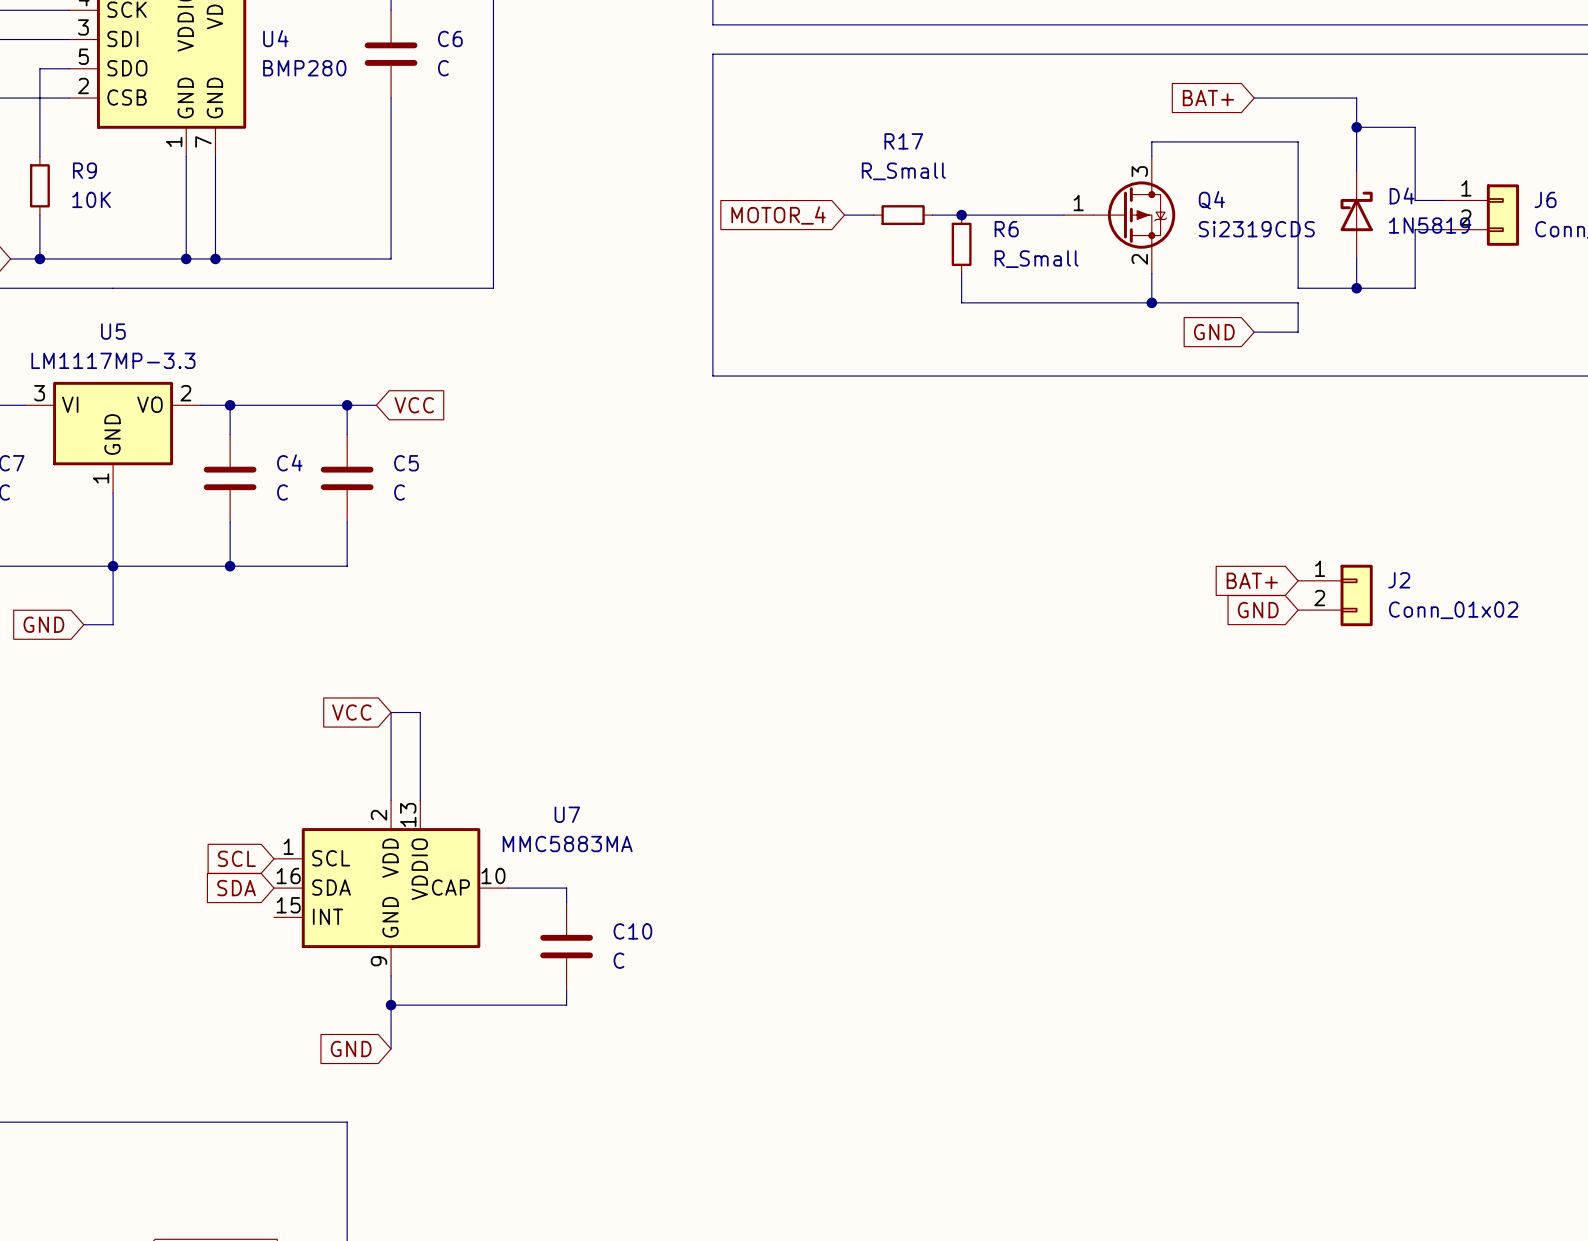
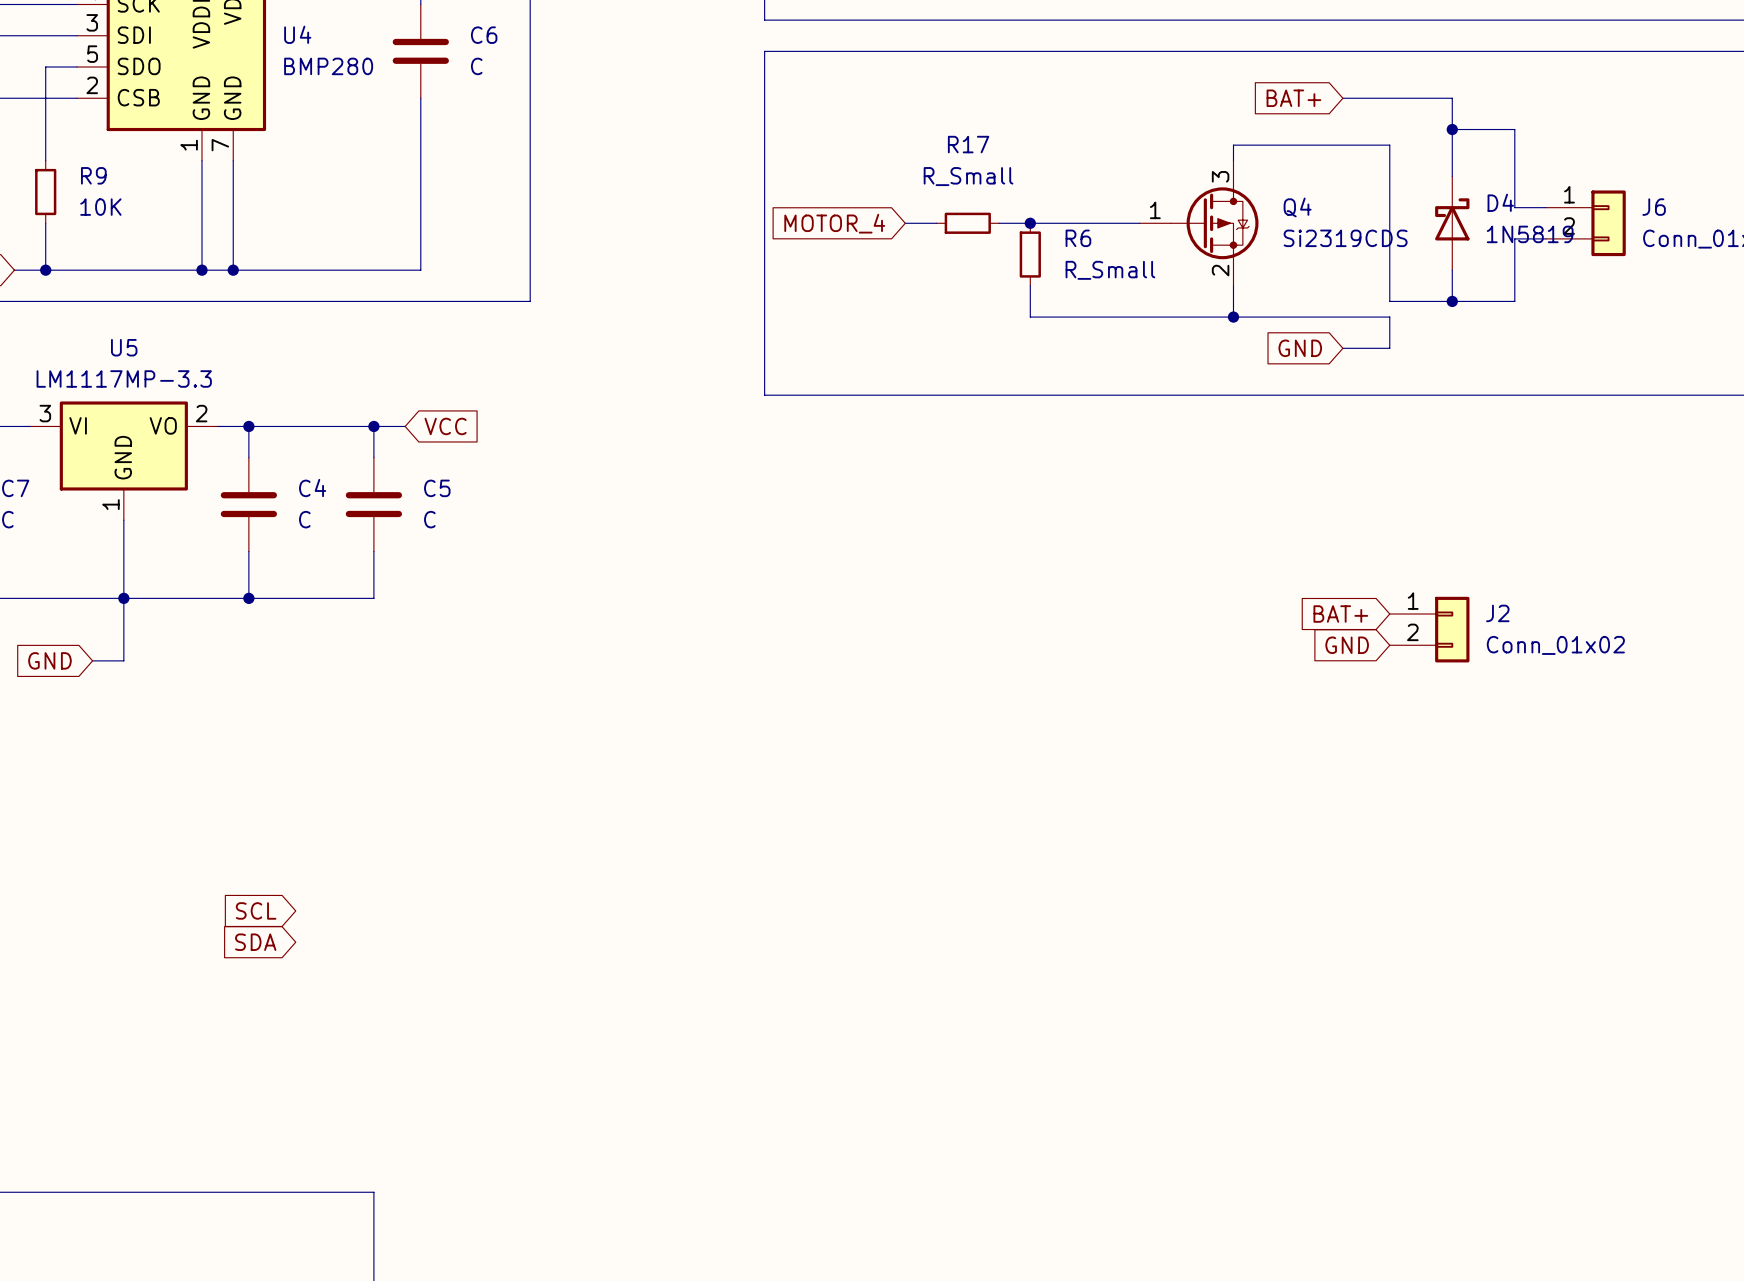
global label: VCC (351, 712) -> none
wire: (391, 800) (391, 712) (420, 712) (420, 800) -> none
U7: MMC5883MA (391, 888) -> none
wire: (508, 888) (566, 888) (566, 902) -> none
C10: C (566, 946) -> none
wire: (391, 975) (391, 1049) -> none
wire: (566, 990) (566, 1005) (391, 1005) -> none
junction: (391, 1005) -> none
global label: GND (351, 1049) -> none

